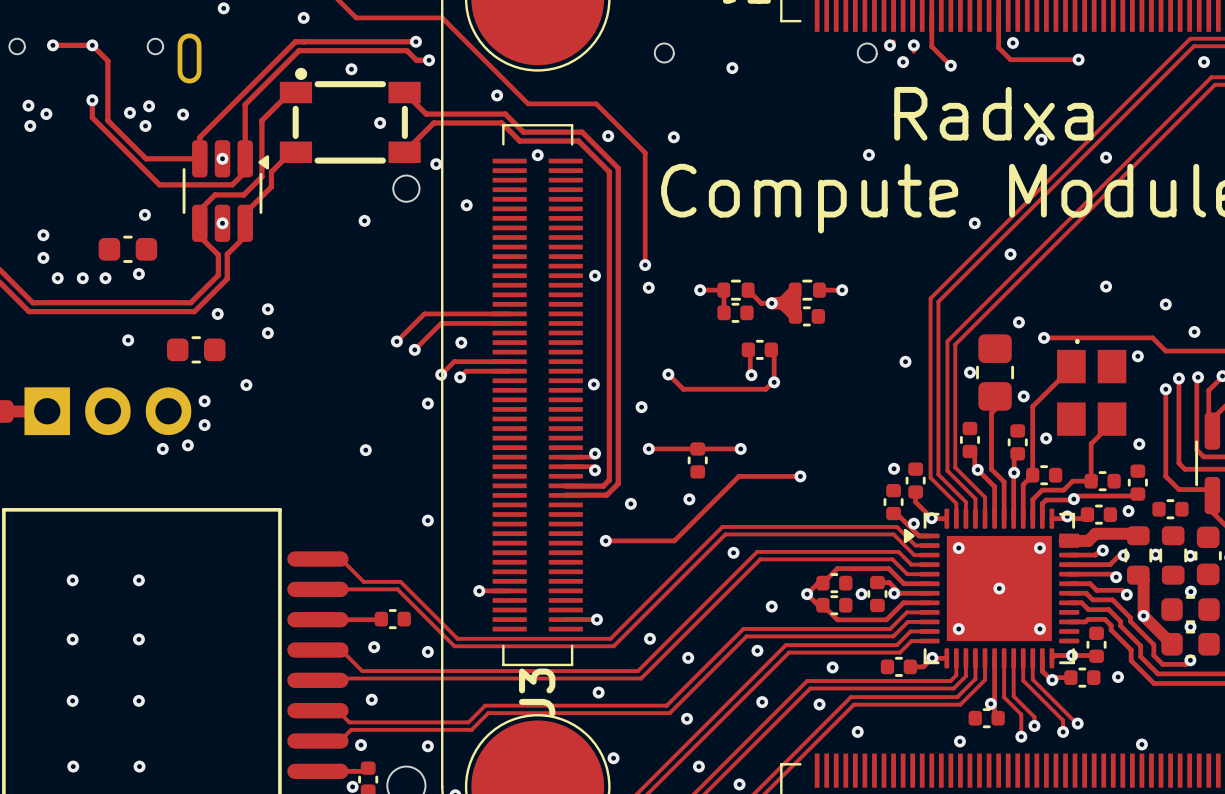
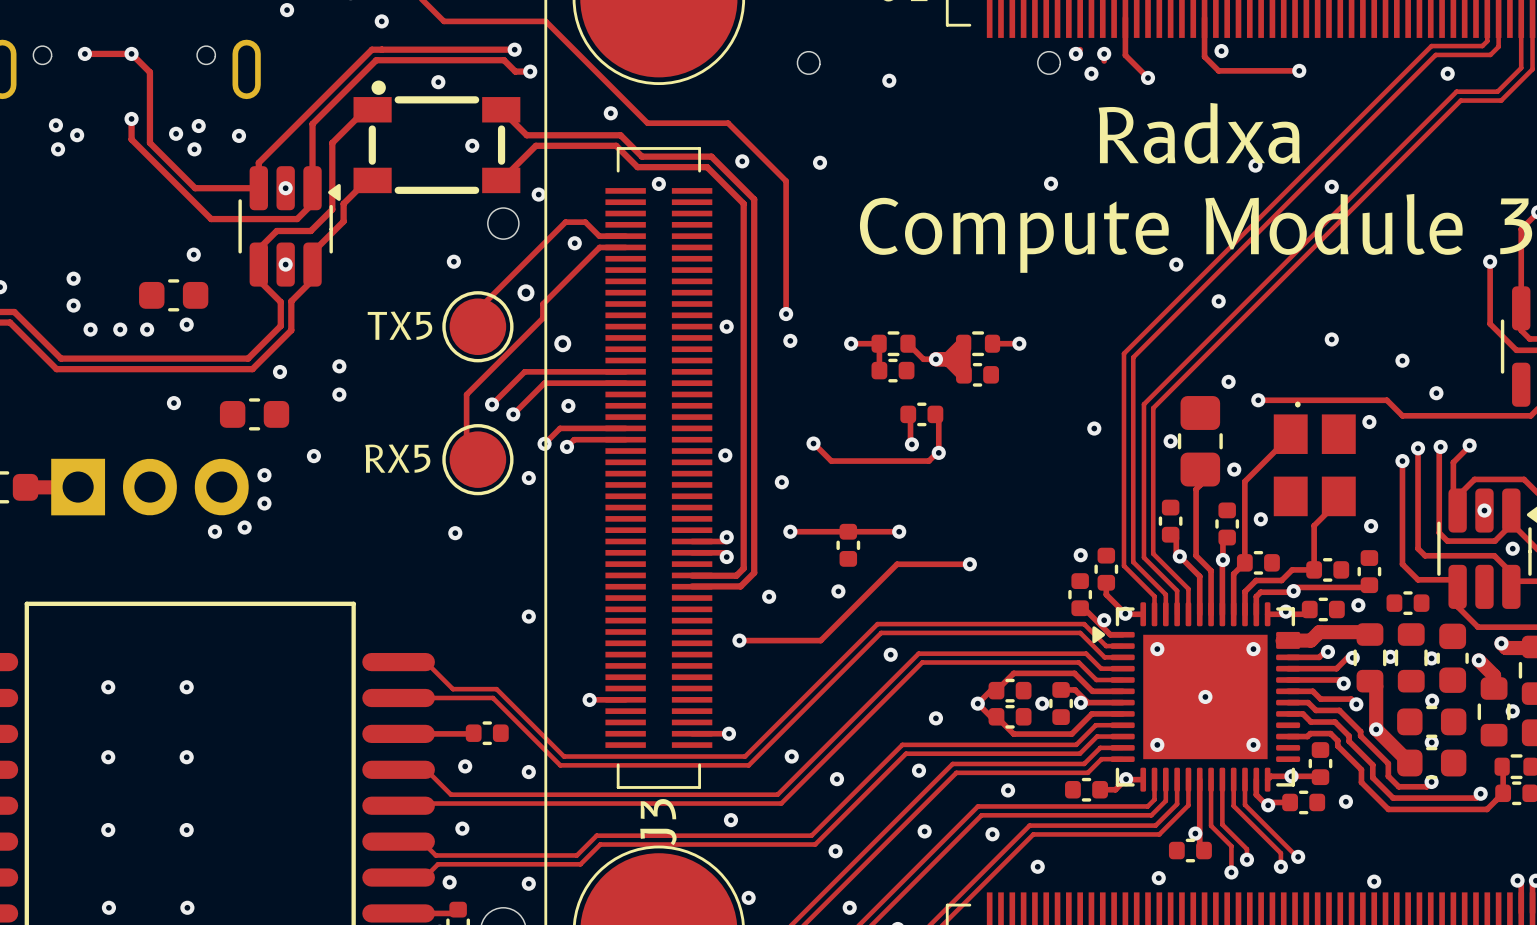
track: none -> (625, 236) (599, 236) (585, 222) (565, 222) (477, 309) (477, 326)
track: none -> (625, 247) (599, 247) (542, 304) (542, 318) (466, 394) (466, 448) (477, 459)
via: none -> (525, 292)
TX5: none -> (477, 326)
via: none -> (562, 343)
RX5: none -> (477, 459)

